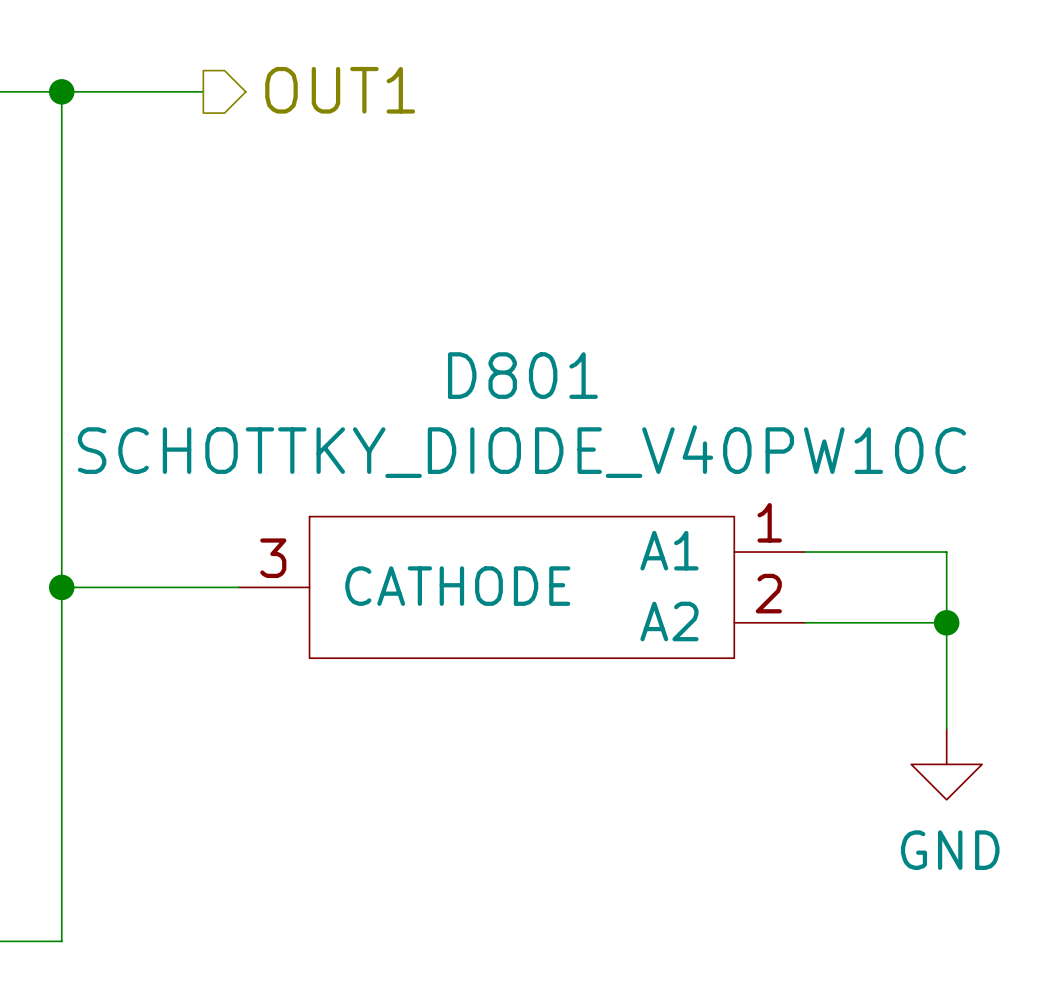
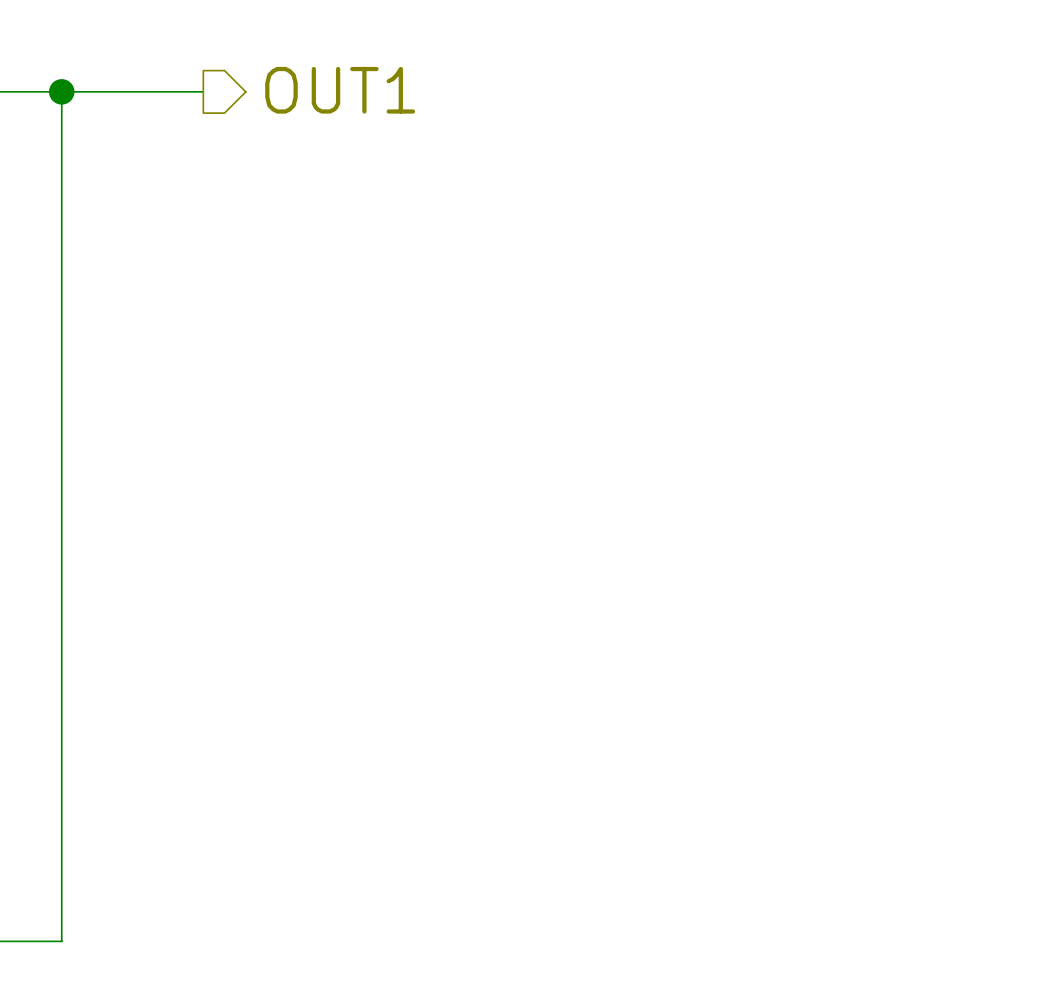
wire: (805, 552) (946, 552) (946, 729) -> none
wire: (61, 587) (238, 587) -> none
junction: (61, 587) -> none
D801: SCHOTTKY_DIODE_V40PW10C (521, 587) -> none
wire: (805, 622) (946, 622) -> none
junction: (946, 622) -> none
power symbol: GND (946, 764) -> none

